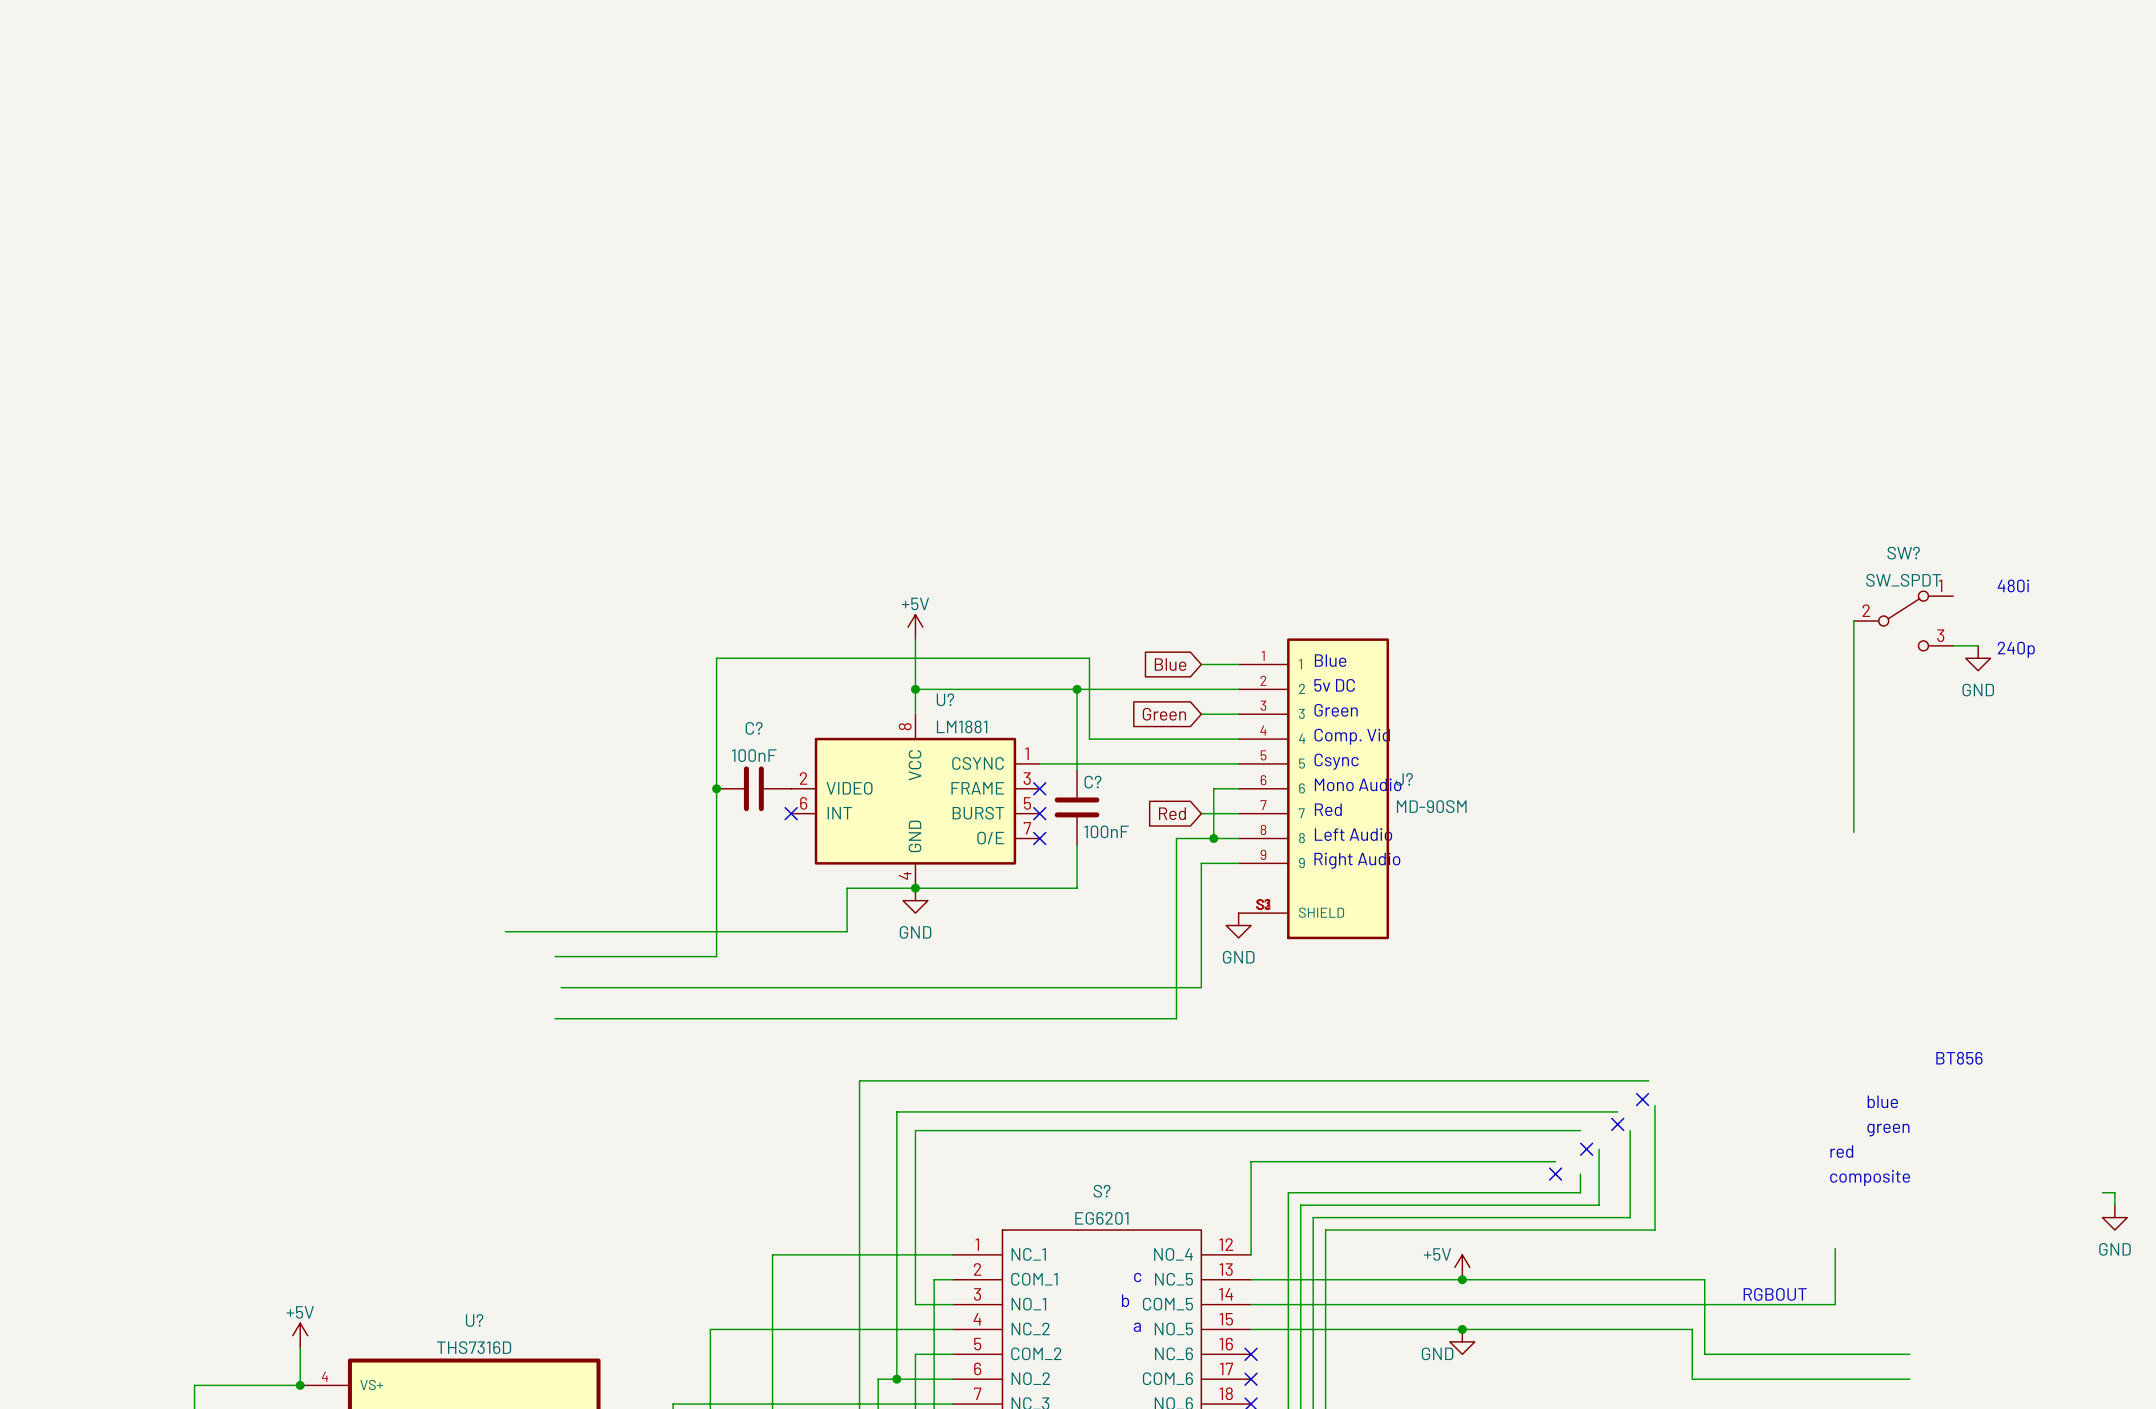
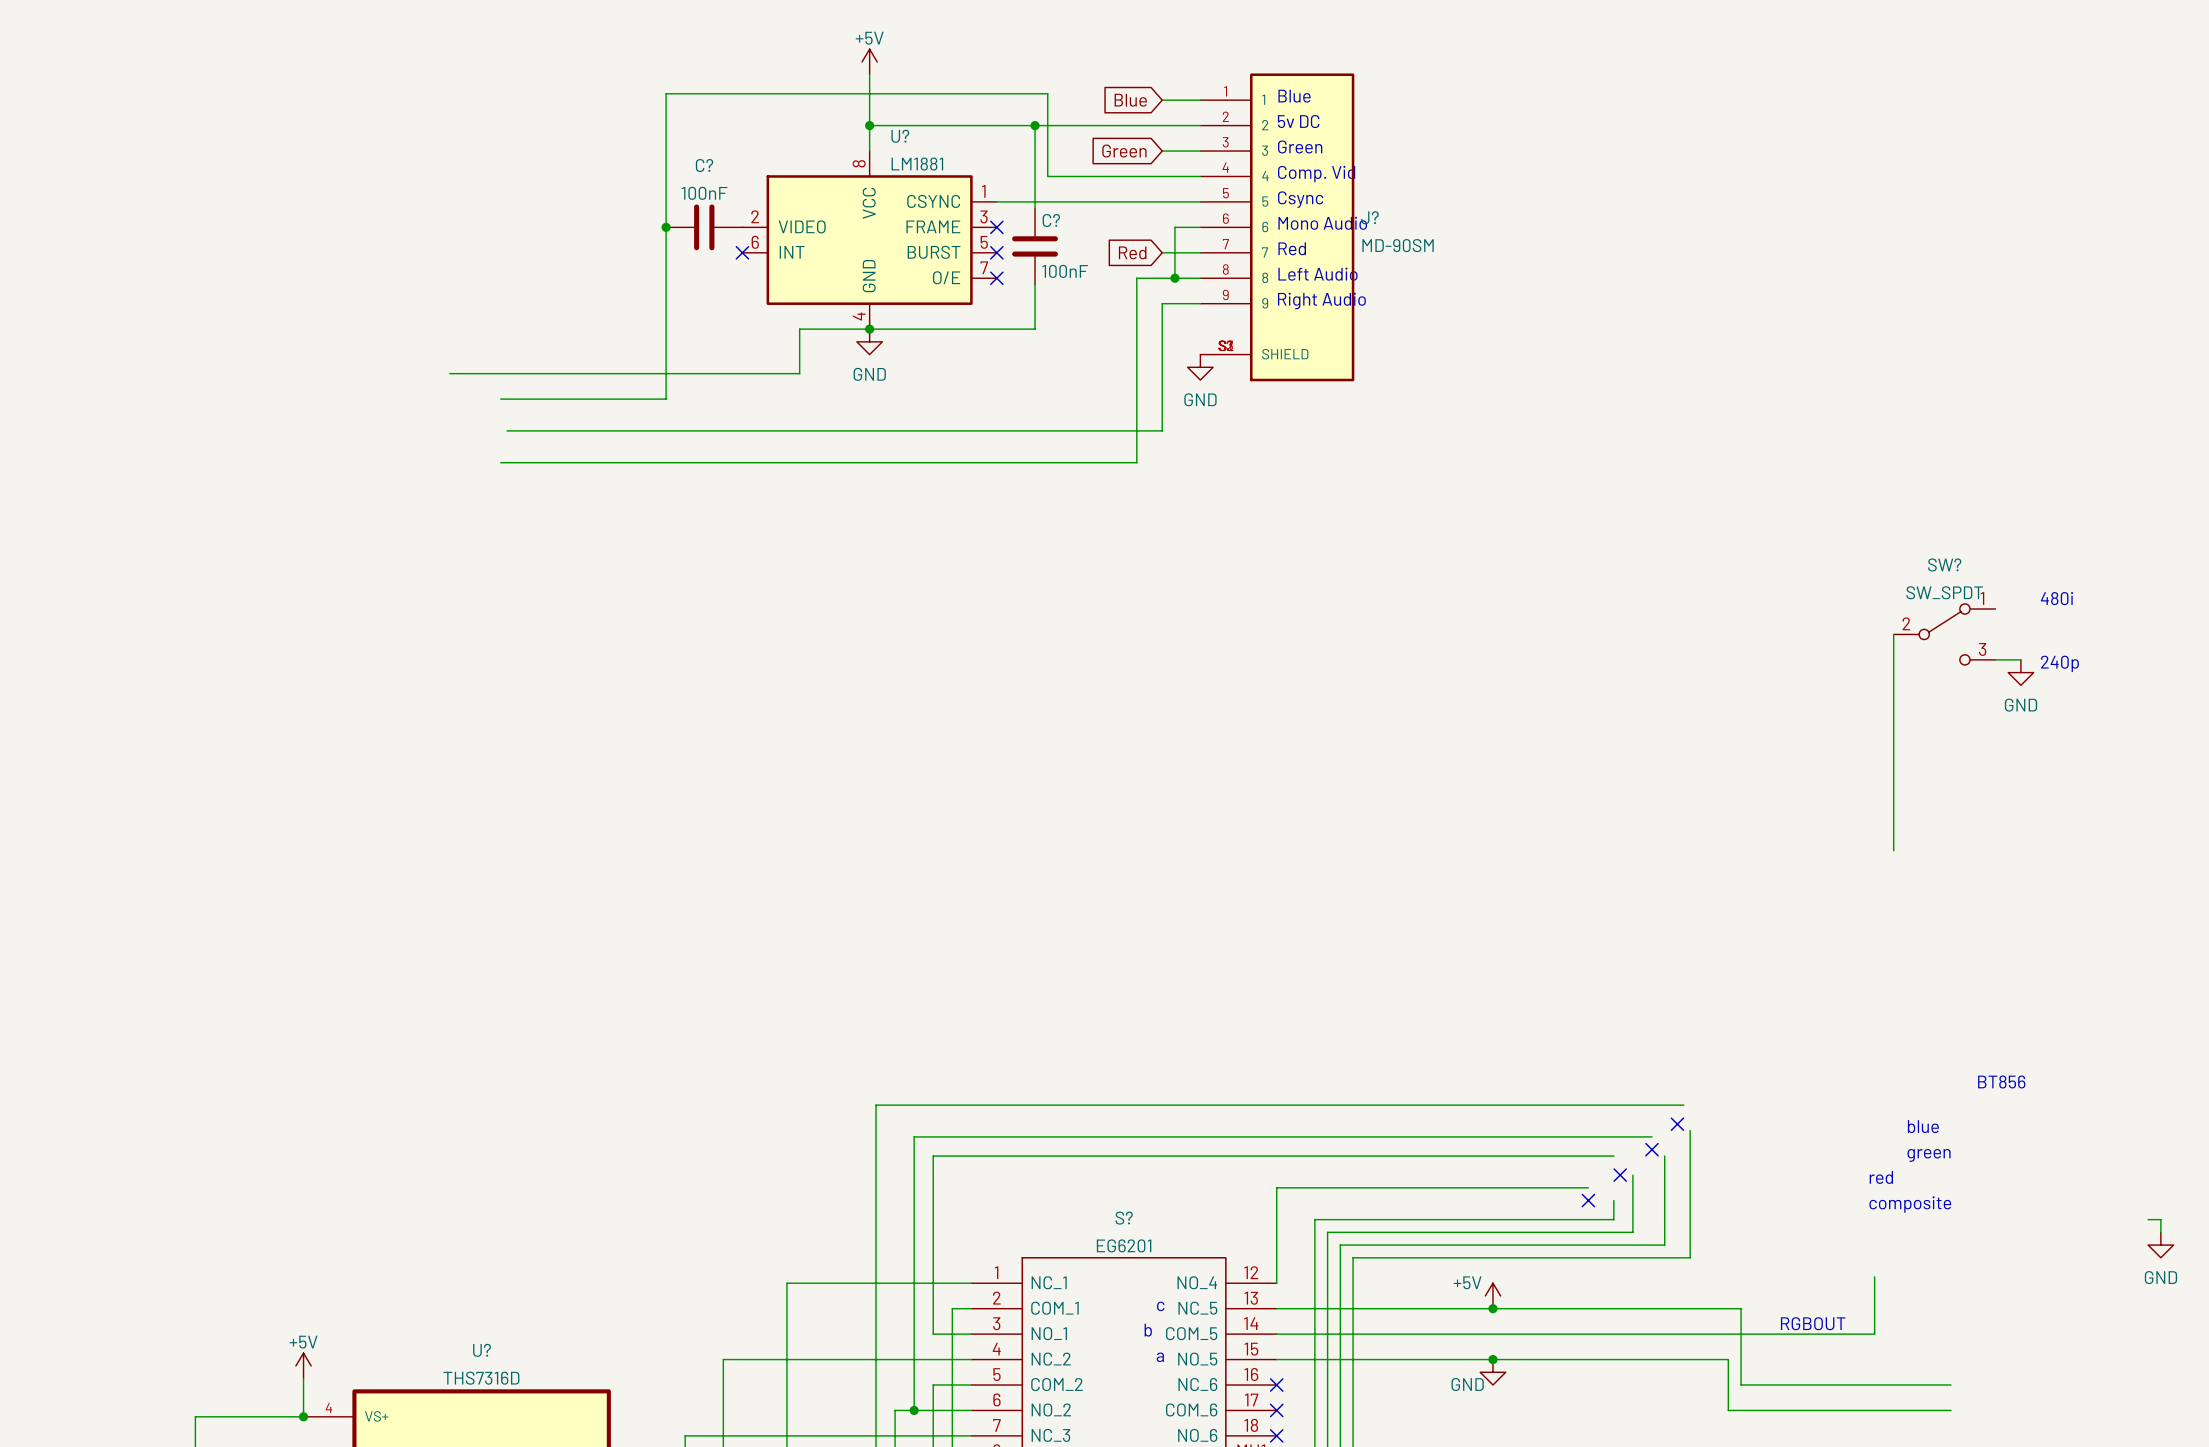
power symbol: none -> +5V (869, 61)
wire: none -> (869, 74) (869, 151)
text: none -> Blue (1294, 96)
wire: none -> (1162, 100) (1200, 100)
global label: none -> Blue (1130, 100)
text: none -> 5v DC (1298, 121)
wire: none -> (869, 125) (1200, 125)
junction: none -> (869, 125)
wire: none -> (1035, 125) (1035, 208)
junction: none -> (1035, 125)
text: none -> Green (1300, 146)
global label: none -> Green (1124, 151)
wire: none -> (1162, 151) (1200, 151)
text: none -> Comp. Vid (1316, 174)
wire: none -> (1200, 176) (1047, 176) (1047, 93) (666, 93) (666, 399) (500, 399)
text: none -> Csync (1300, 199)
wire: none -> (996, 201) (1200, 201)
text: none -> Mono Audio (1322, 223)
junction: none -> (666, 227)
C?: none -> 100nF (704, 227)
no-connect mark: none -> (996, 227)
wire: none -> (1200, 227) (1174, 227) (1174, 278)
J?: none -> MD-90SM (1277, 227)
U?: none -> LM1881 (869, 240)
C?: none -> 100nF (1035, 246)
text: none -> Red (1292, 248)
no-connect mark: none -> (742, 252)
no-connect mark: none -> (996, 252)
global label: none -> Red (1132, 252)
wire: none -> (1162, 252) (1200, 252)
text: none -> Left Audio (1317, 274)
no-connect mark: none -> (996, 278)
junction: none -> (1174, 278)
wire: none -> (1200, 278) (1136, 278) (1136, 462) (500, 462)
wire: none -> (1035, 284) (1035, 329) (799, 329) (799, 373) (449, 373)
text: none -> Right Audio (1321, 301)
wire: none -> (1200, 303) (1162, 303) (1162, 430) (507, 430)
junction: none -> (869, 329)
power symbol: none -> GND (869, 341)
power symbol: none -> GND (1200, 367)
power symbol: +5V (915, 627) -> none
wire: (915, 639) (915, 714) -> none
text: Blue (1330, 660) -> none
global label: Blue (1170, 664) -> none
wire: (1201, 664) (1238, 664) -> none
text: 5v DC (1334, 685) -> none
wire: (915, 689) (1238, 689) -> none
junction: (915, 689) -> none
wire: (1077, 689) (1077, 770) -> none
junction: (1077, 689) -> none
text: Green (1336, 710) -> none
global label: Green (1164, 714) -> none
wire: (1201, 714) (1238, 714) -> none
text: Comp. Vid (1352, 736) -> none
wire: (1238, 739) (1089, 739) (1089, 658) (716, 658) (716, 956) (555, 956) -> none
text: Csync (1336, 761) -> none
wire: (1039, 763) (1238, 763) -> none
text: Mono Audio (1358, 784) -> none
junction: (716, 788) -> none
C?: 100nF (753, 788) -> none
no-connect mark: (1039, 788) -> none
wire: (1238, 788) (1213, 788) (1213, 838) -> none
J?: MD-90SM (1313, 788) -> none
U?: LM1881 (915, 801) -> none
C?: 100nF (1077, 807) -> none
text: Red (1328, 809) -> none
no-connect mark: (791, 813) -> none
no-connect mark: (1039, 813) -> none
global label: Red (1172, 813) -> none
wire: (1201, 813) (1238, 813) -> none
text: Left Audio (1353, 834) -> none
no-connect mark: (1039, 838) -> none
junction: (1213, 838) -> none
wire: (1238, 838) (1176, 838) (1176, 1018) (555, 1018) -> none
wire: (1077, 844) (1077, 888) (847, 888) (847, 931) (505, 931) -> none
text: Right Audio (1357, 860) -> none
wire: (1238, 863) (1201, 863) (1201, 987) (561, 987) -> none
junction: (915, 888) -> none
power symbol: GND (915, 900) -> none
power symbol: GND (1238, 925) -> none

